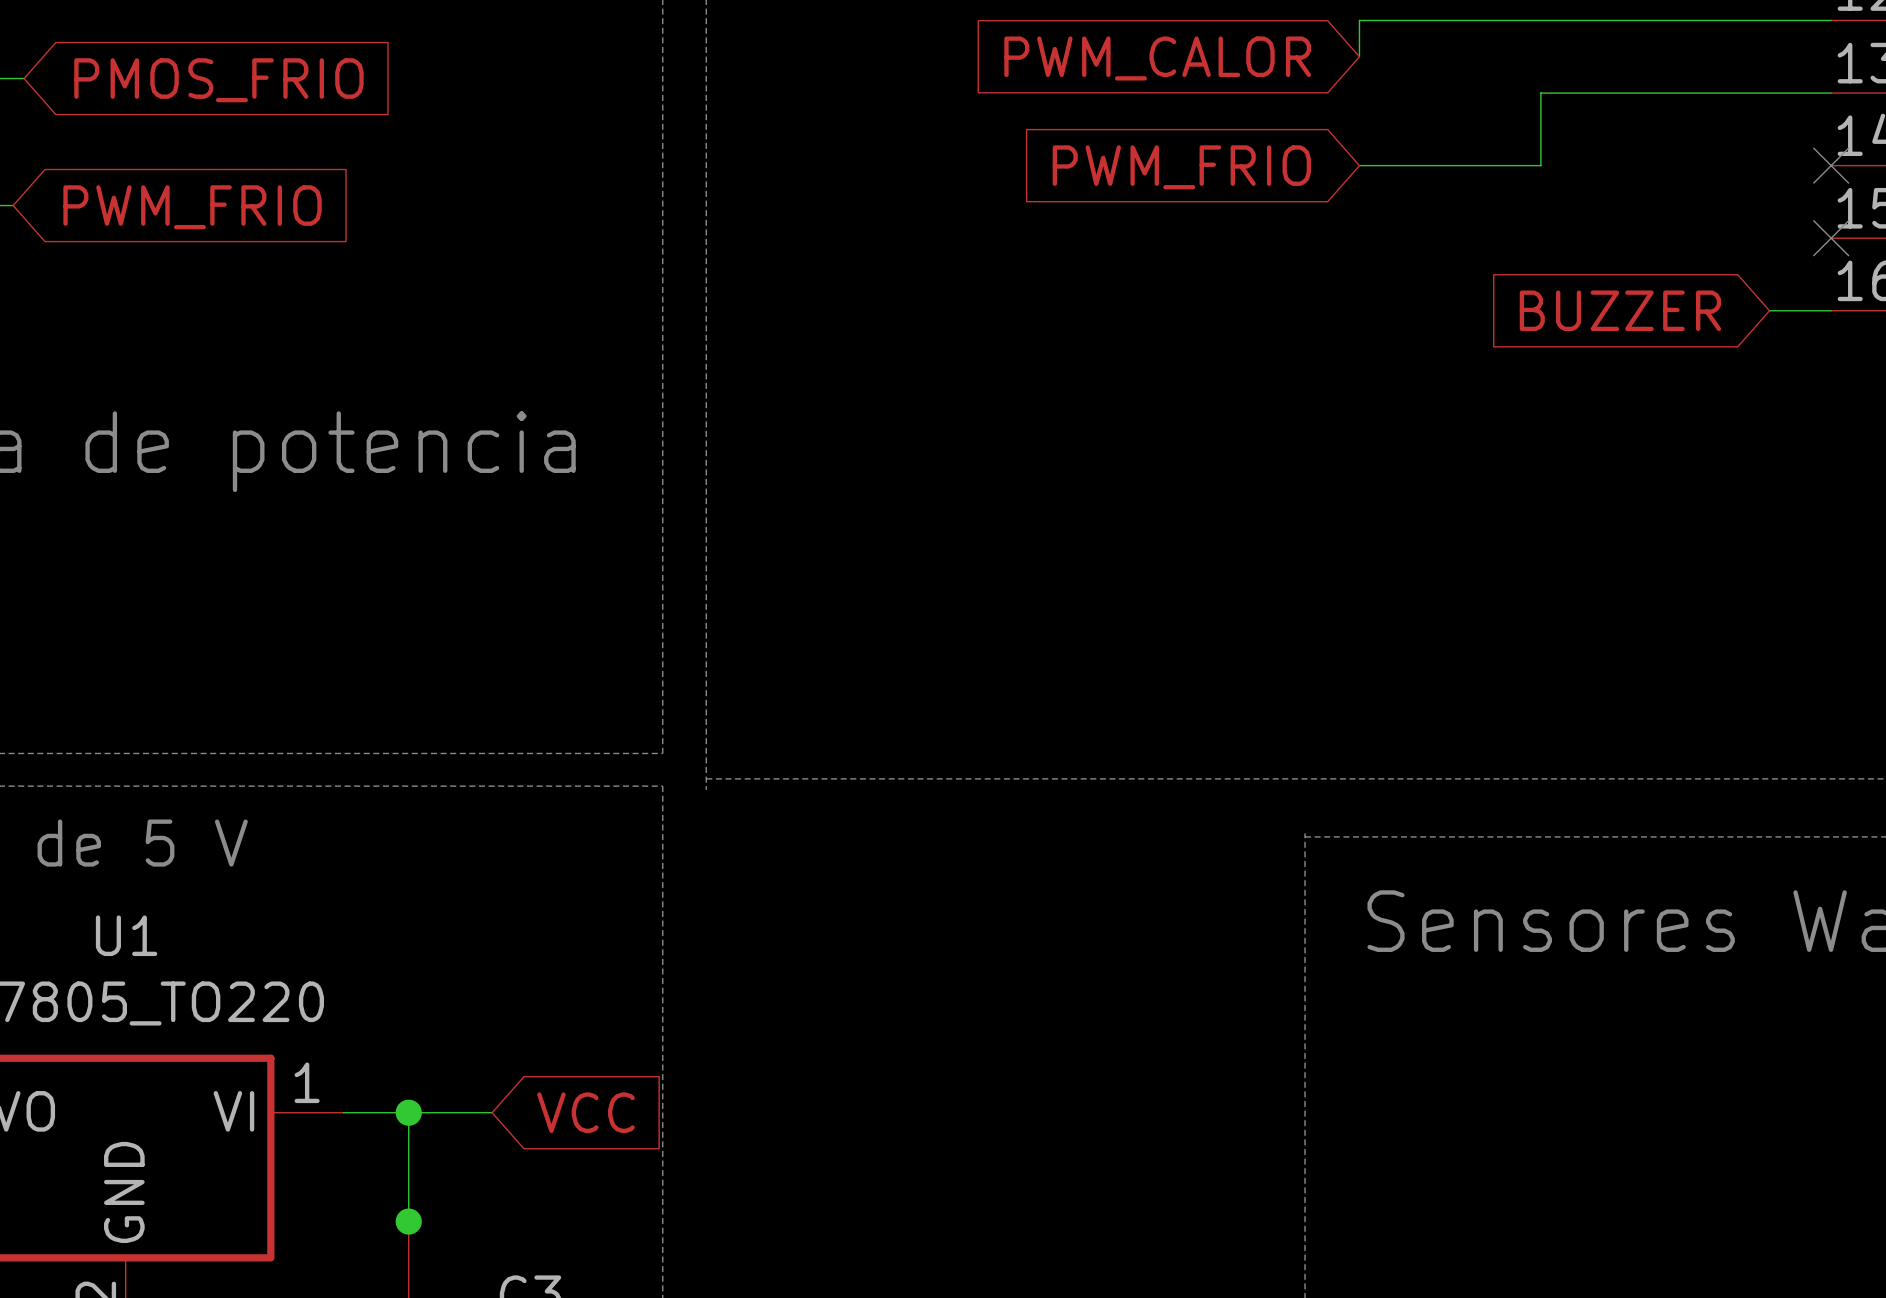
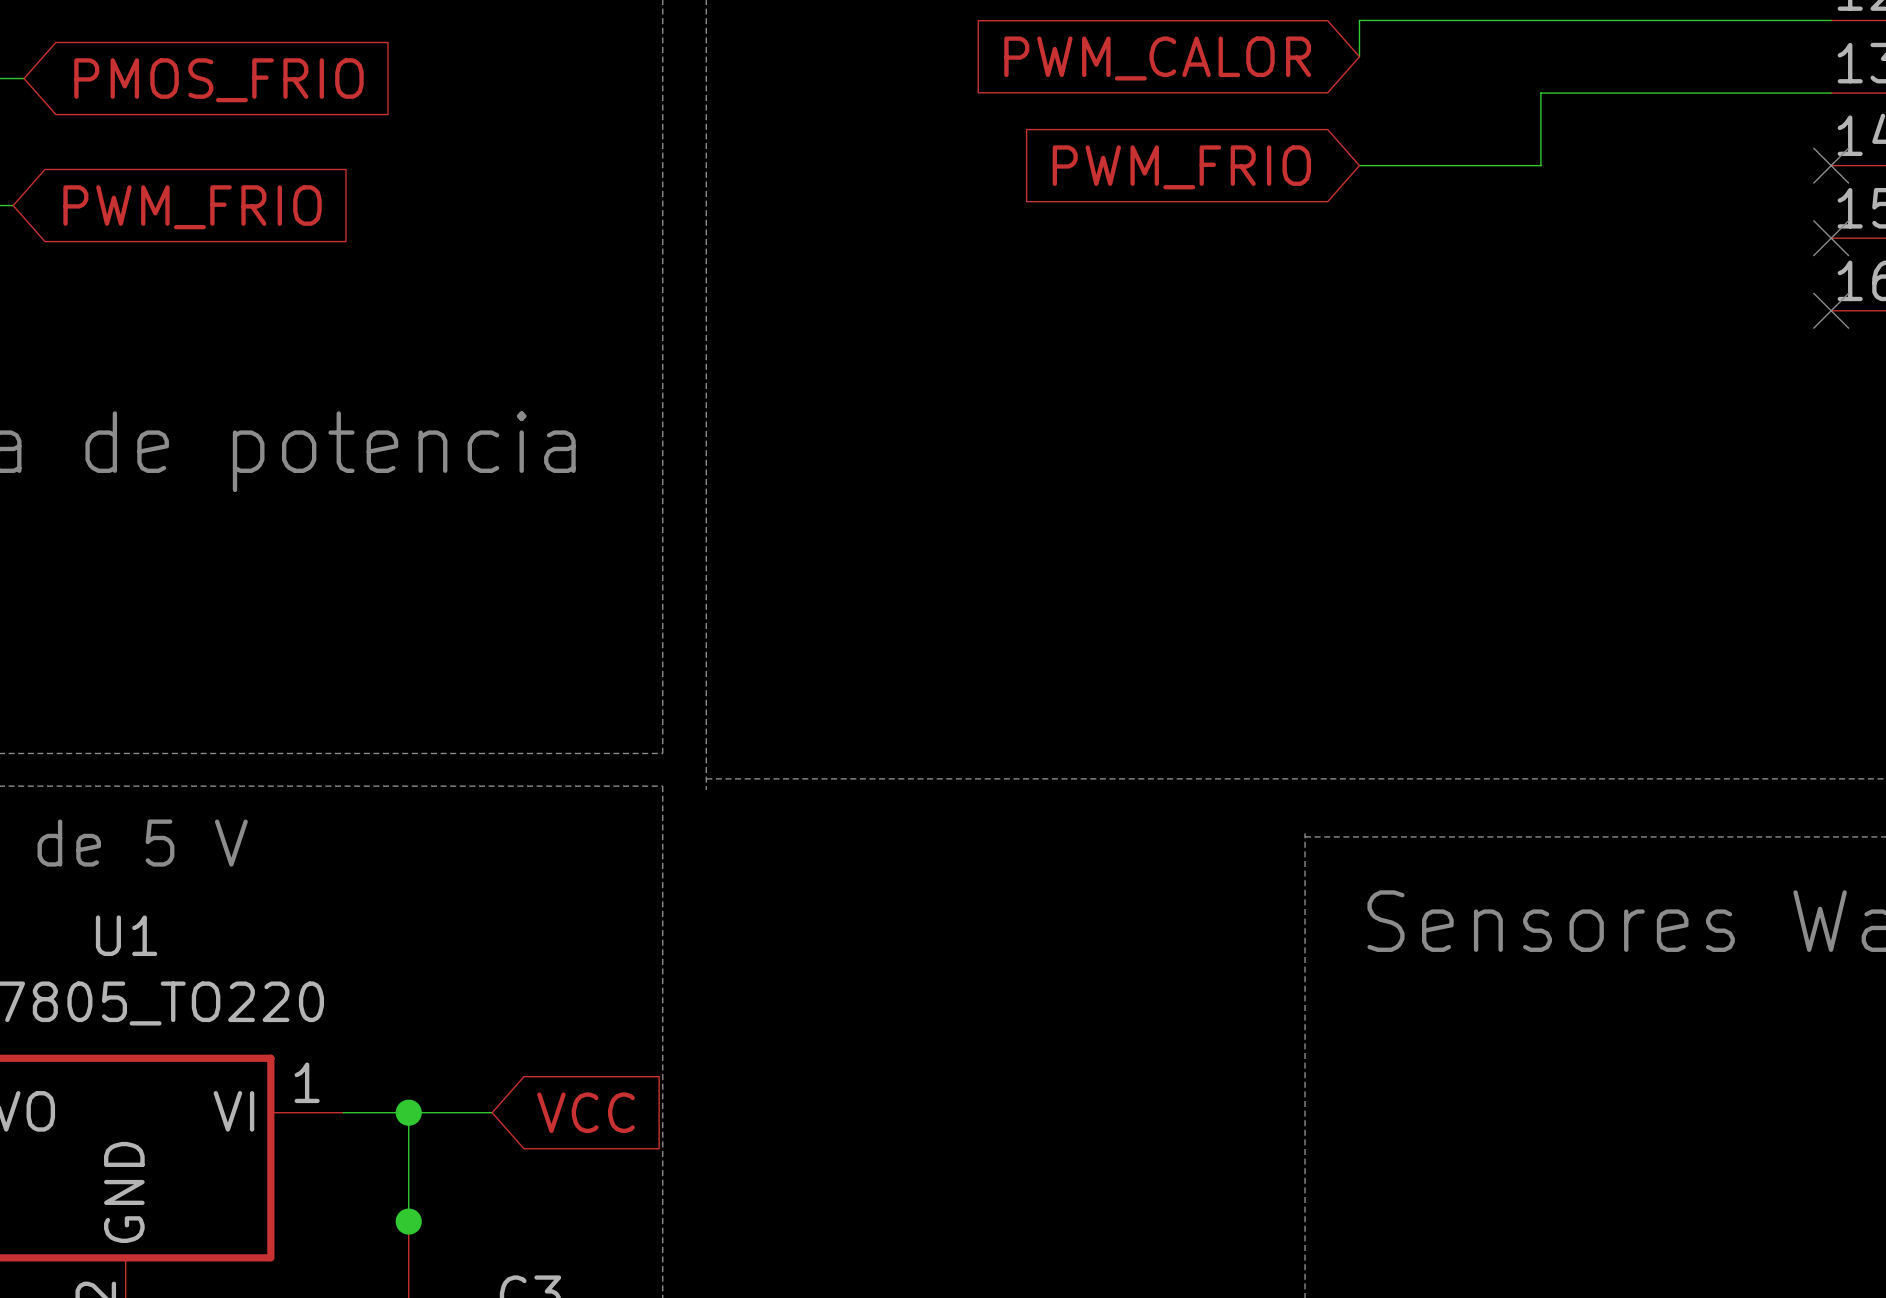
global label: BUZZER (1620, 310) -> none
wire: (1769, 310) (1831, 310) -> none
no-connect mark: none -> (1831, 310)

